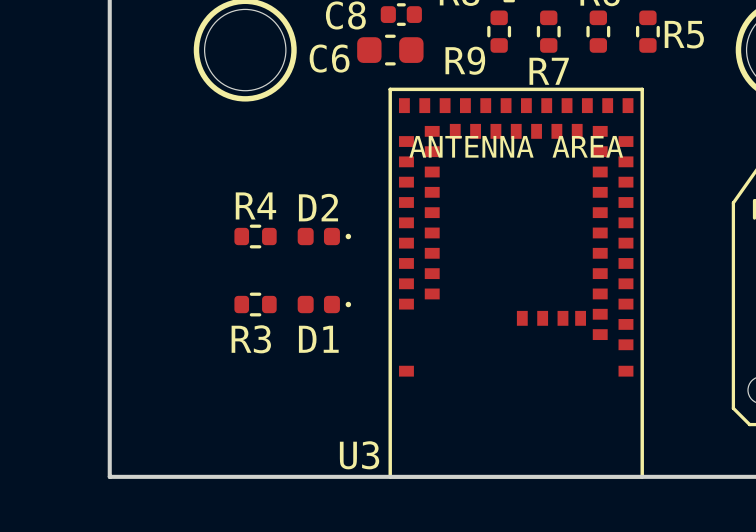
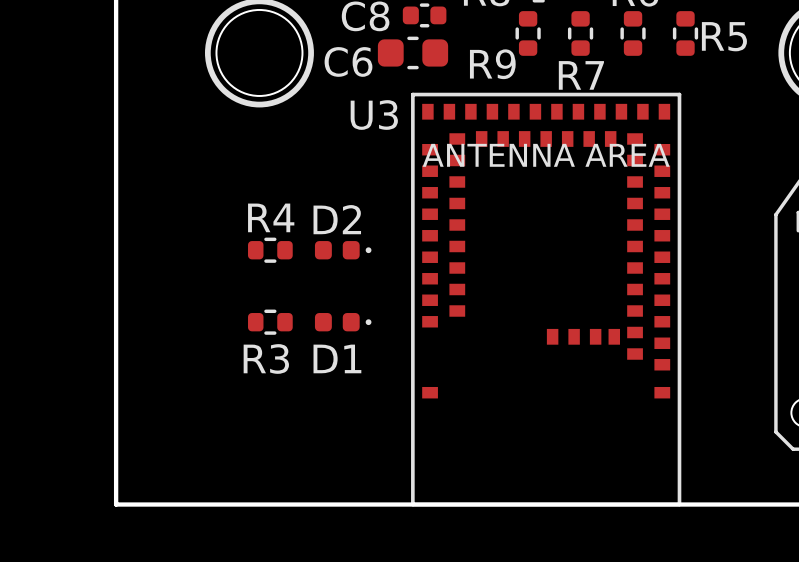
U3 name position: U3 (359, 455) -> U3 (374, 114)

